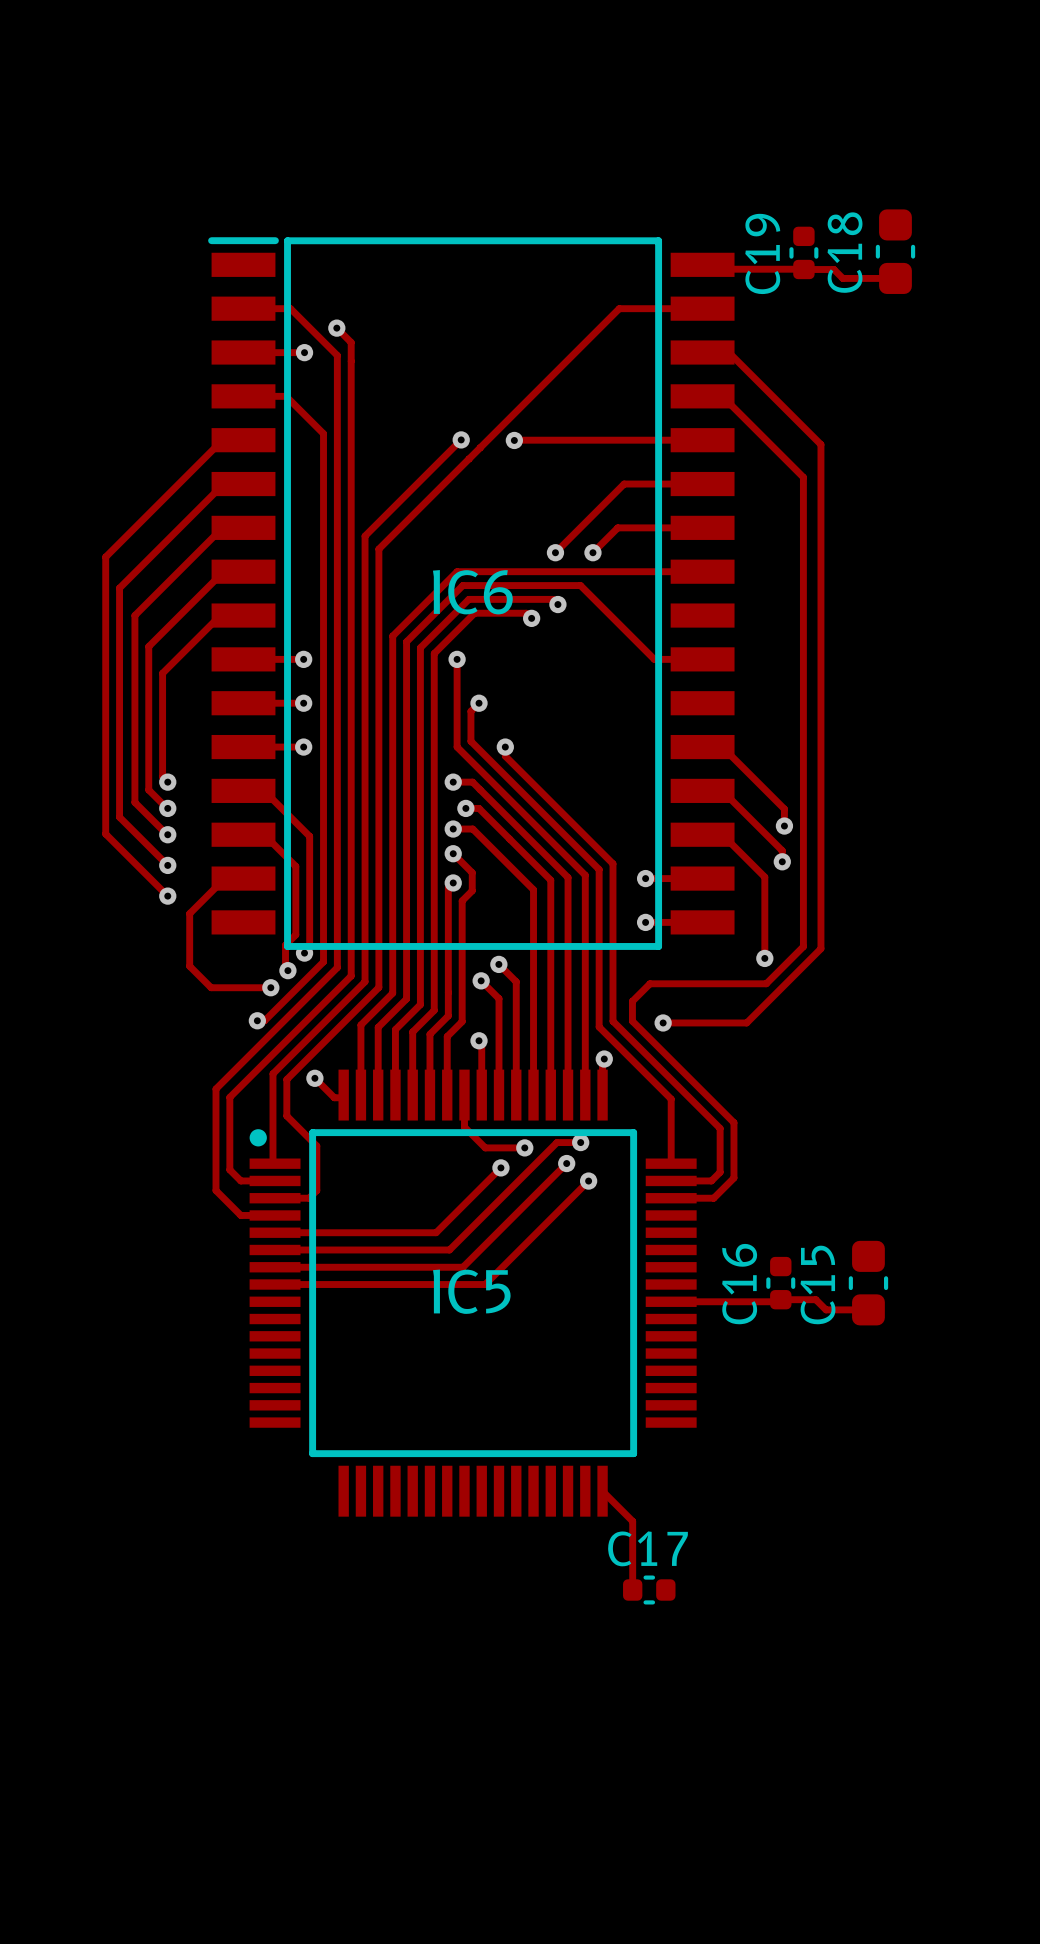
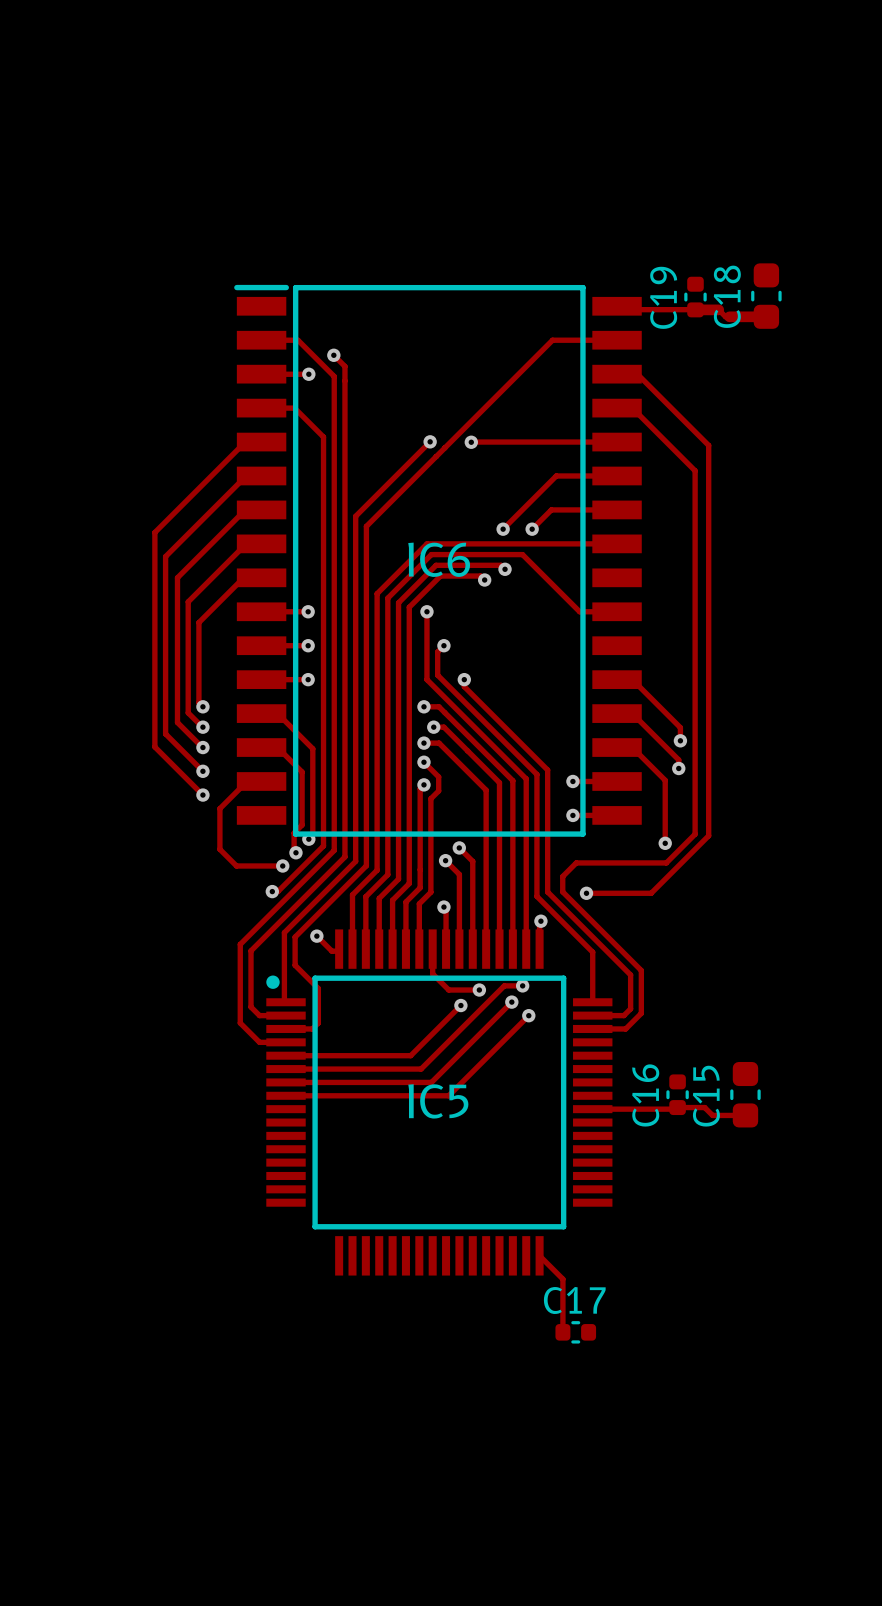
track width: thin (803, 269) (833, 269) -> thick (695, 309) (718, 309)
track width: thin (847, 278) (895, 278) -> thick (729, 316) (766, 316)

